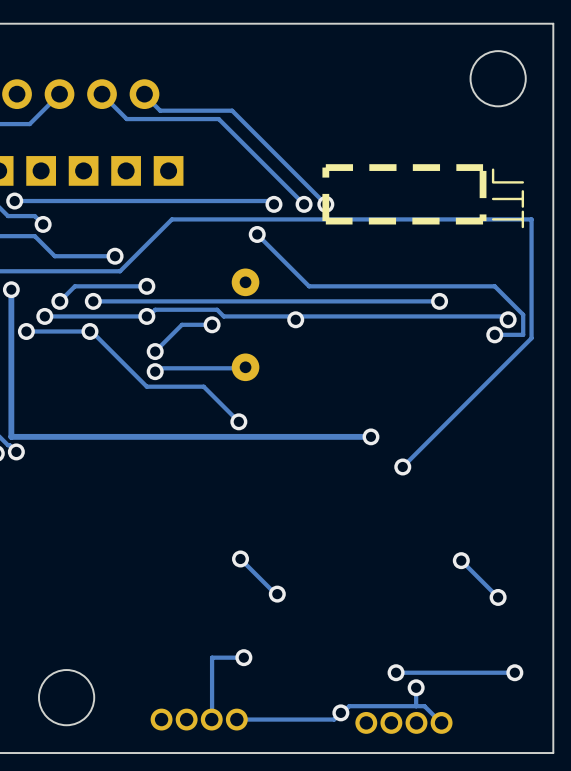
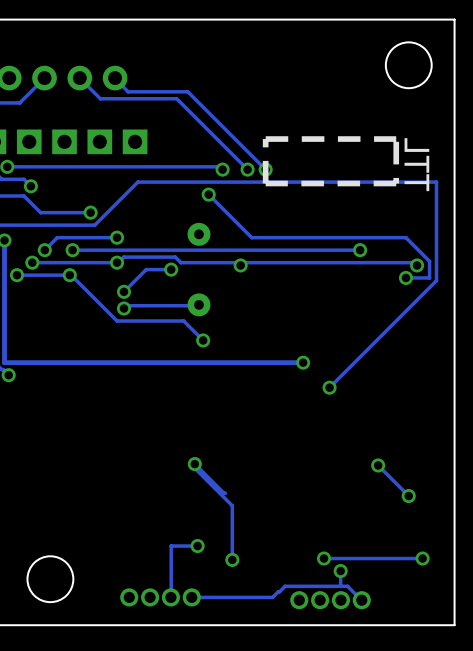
track: (203, 386) (238, 421) -> (164, 321) (183, 321) (203, 340)
via position: (238, 421) -> (203, 340)
track: none -> (190, 464) (232, 505) (232, 559)
via: (277, 594) -> none
via: none -> (232, 559)
via: (340, 712) -> none

